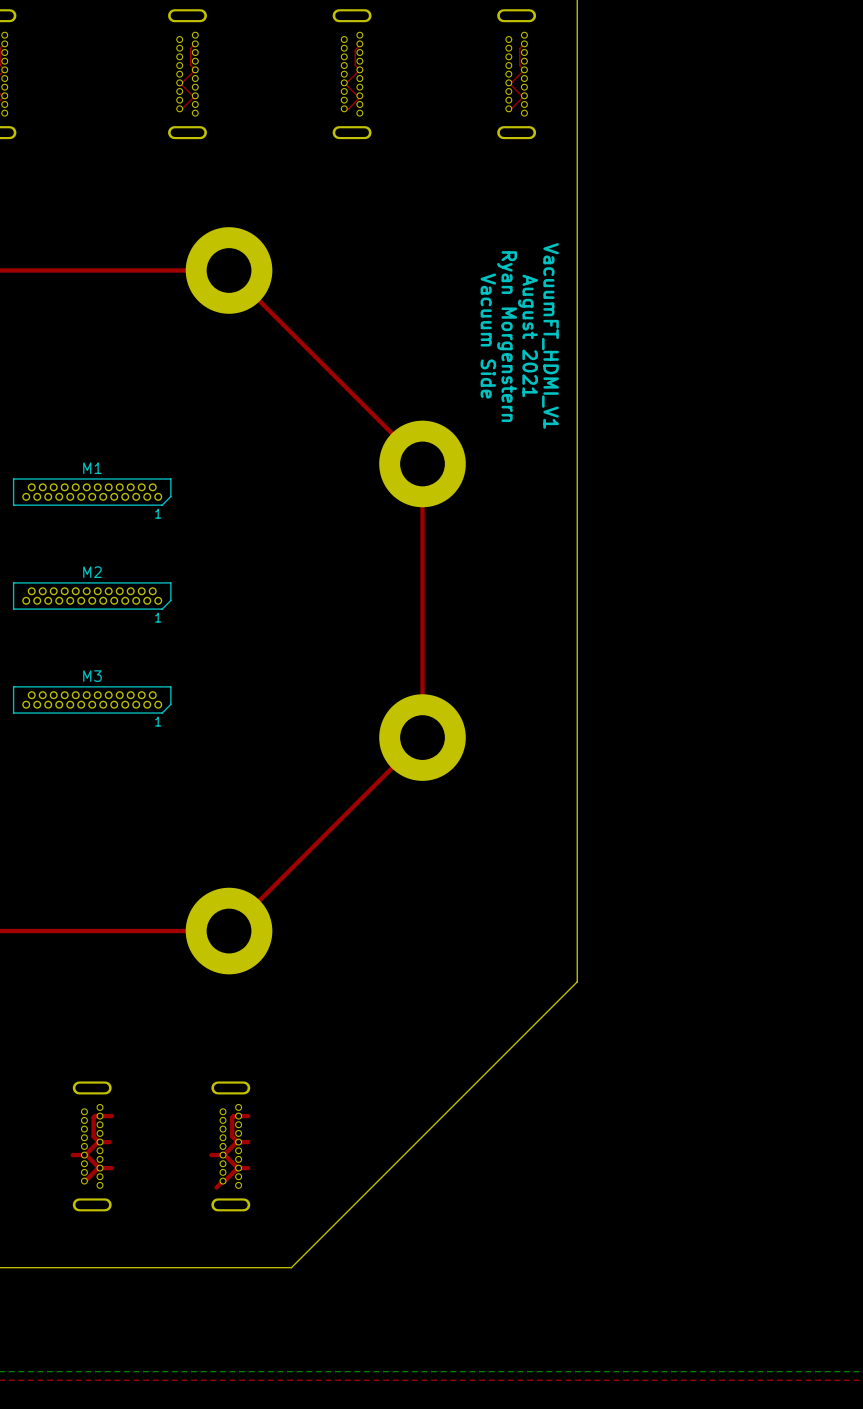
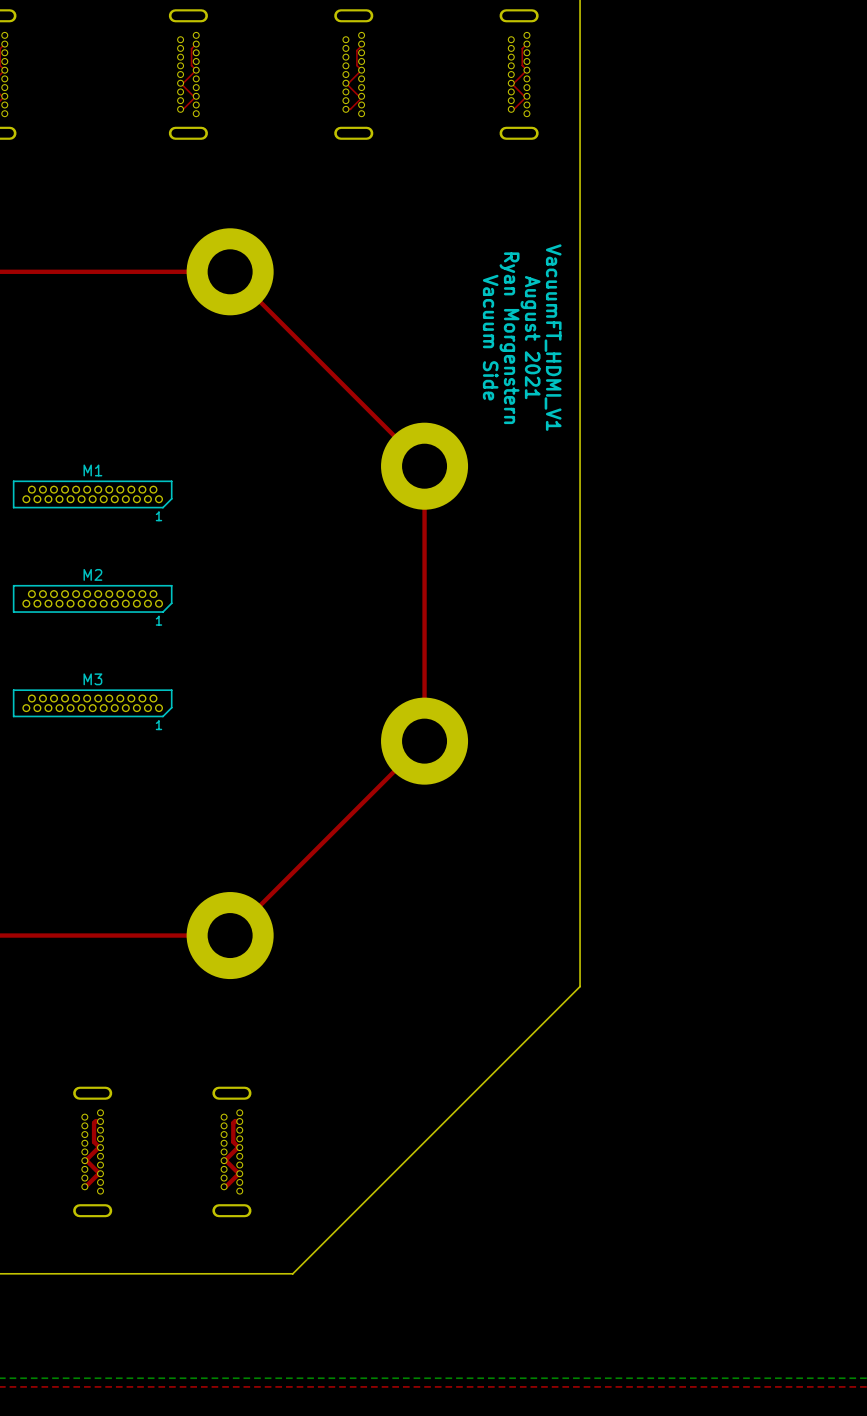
top track: (111, 1116) (100, 1116) -> none
top track: (248, 1116) (238, 1116) -> none
top track: (109, 1142) (100, 1142) -> none
top track: (248, 1142) (238, 1142) -> none
top track: (84, 1155) (72, 1155) -> none
top track: (223, 1155) (211, 1155) -> none
top track: (111, 1168) (100, 1168) -> none
top track: (248, 1168) (238, 1168) -> none
top track: (223, 1181) (216, 1187) -> none

